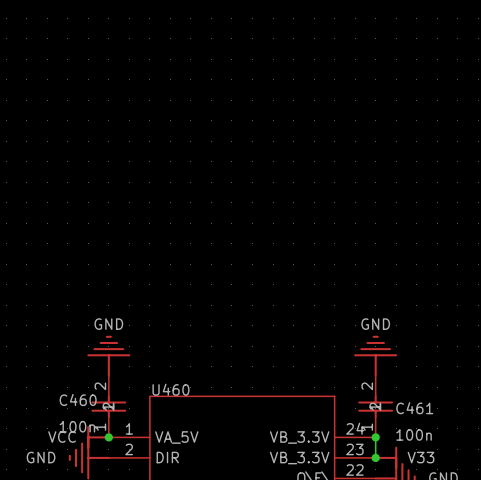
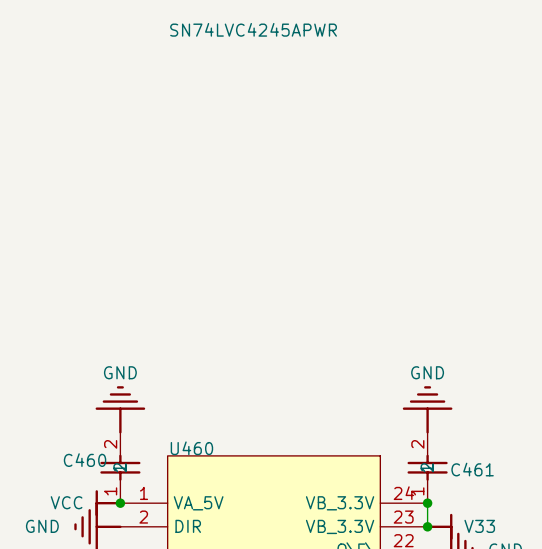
U460 text: none -> SN74LVC4245APWR (253, 29)
C460 value: 100n (77, 426) -> none
C461 value: 100n (414, 434) -> none

